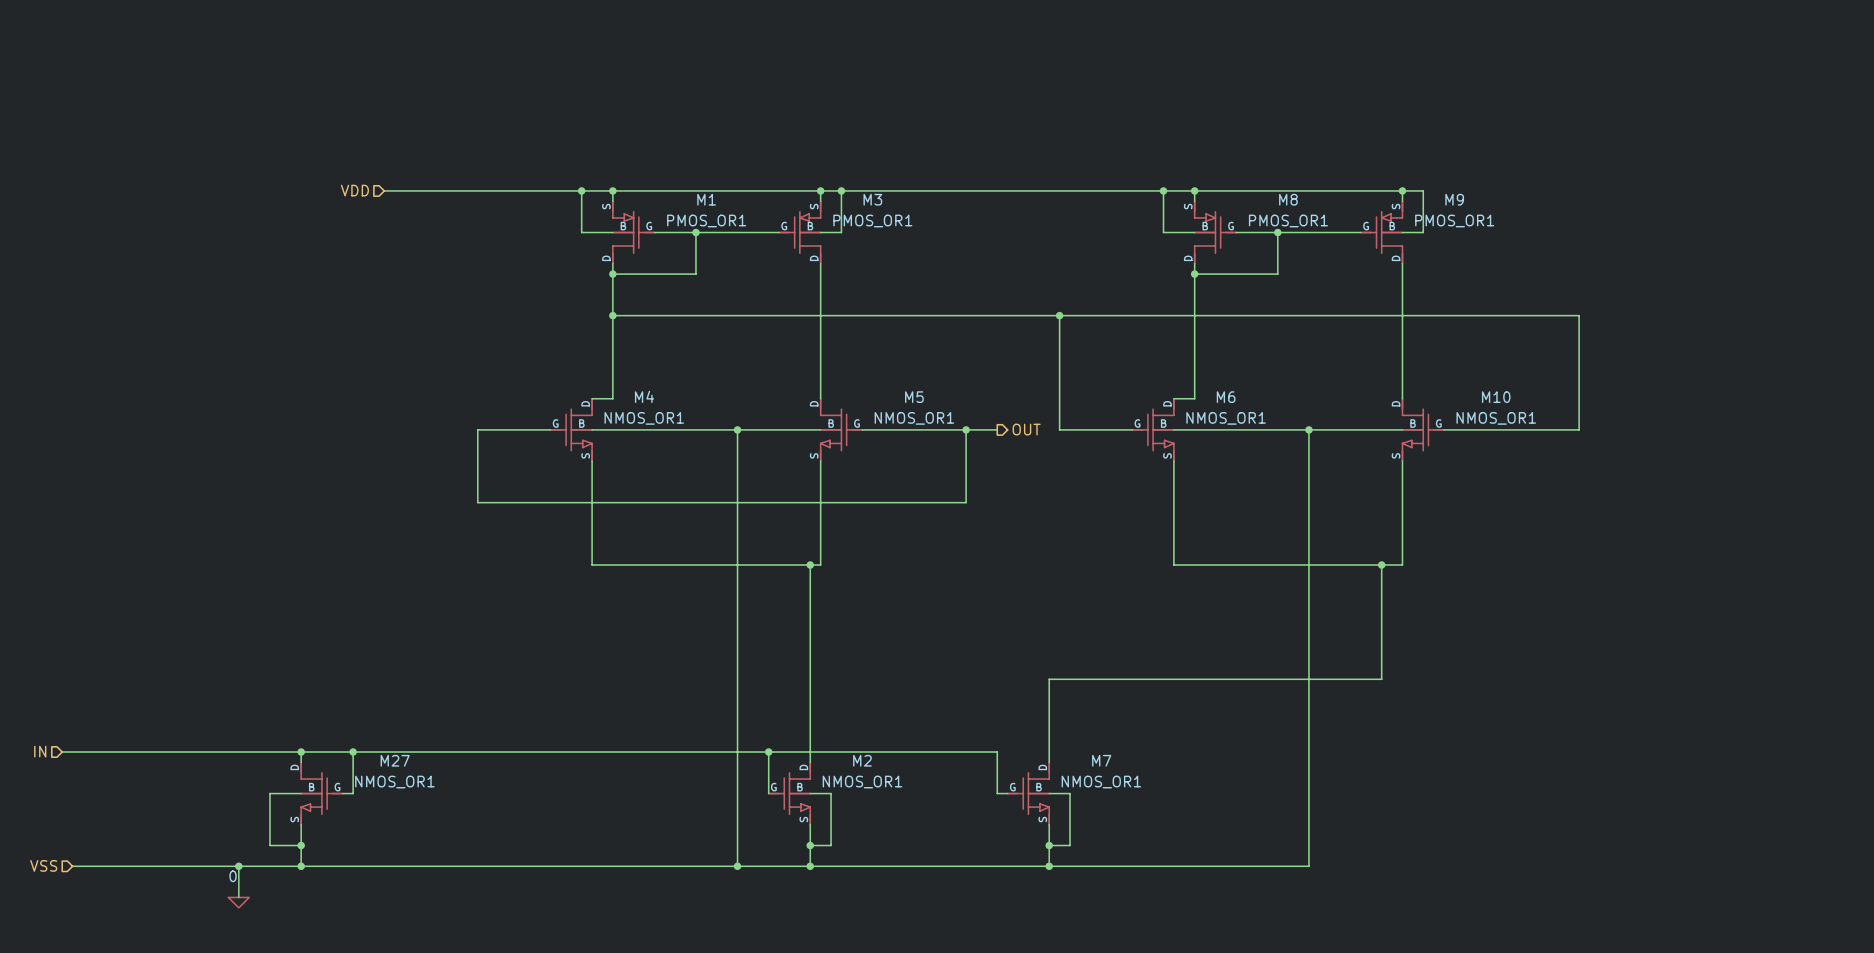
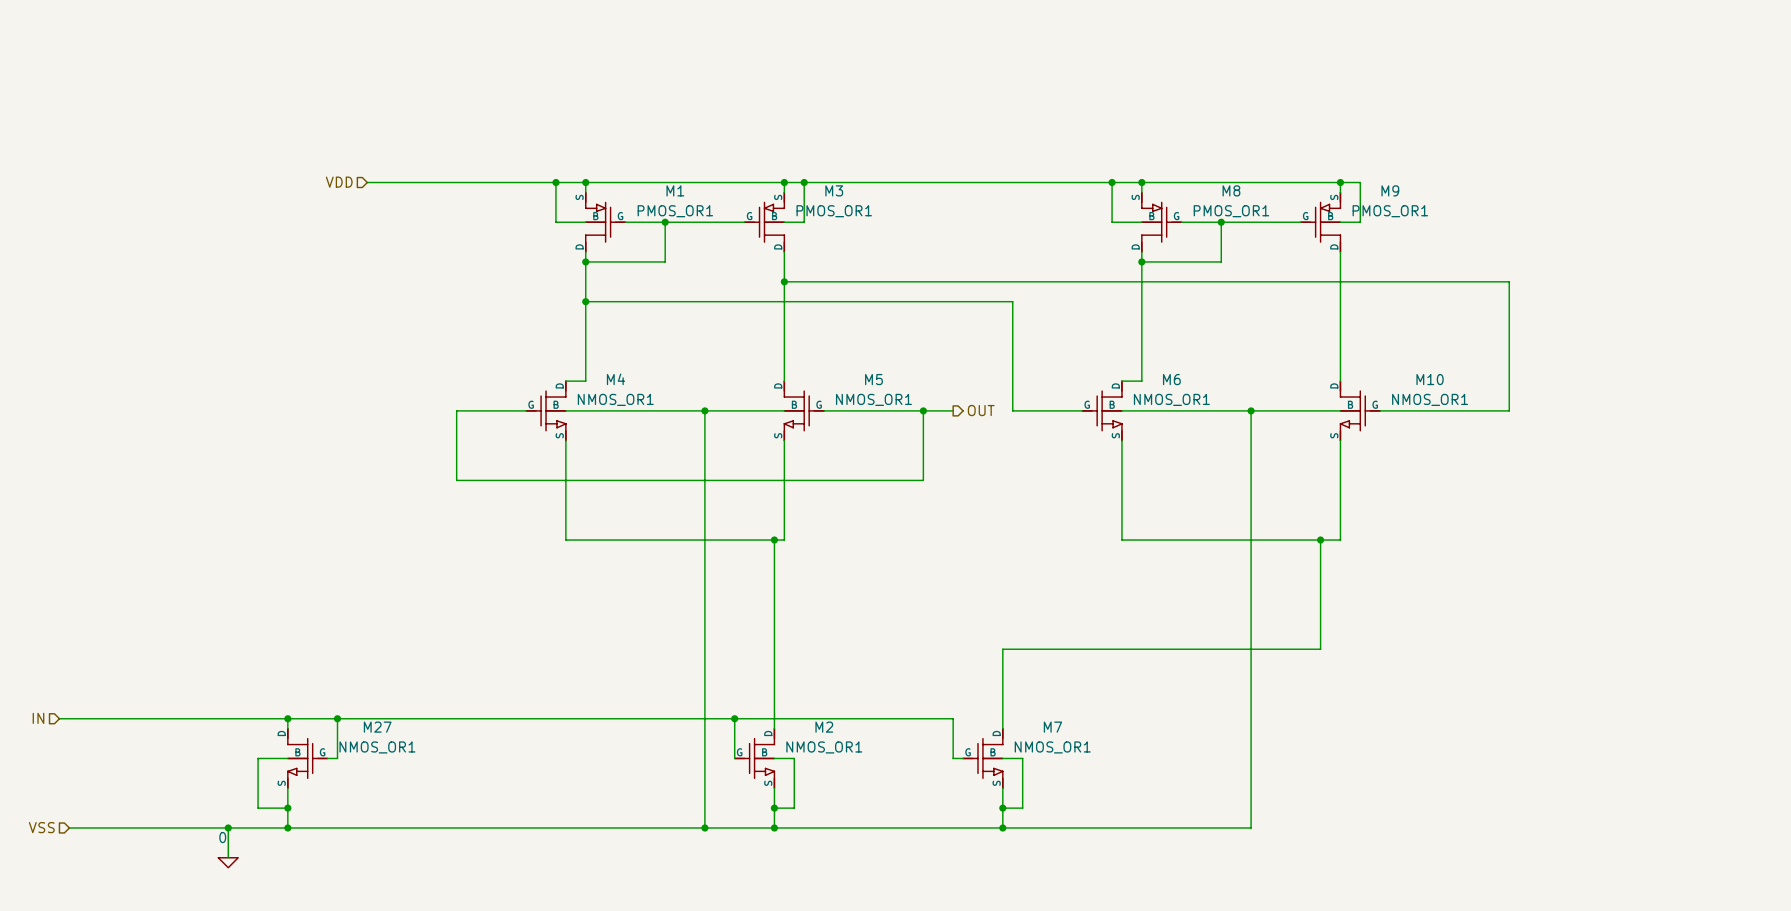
junction: none -> (784, 281)
wire: (1059, 315) (1579, 315) -> (784, 281) (1509, 281) (1509, 301)
junction: (1059, 315) -> none

